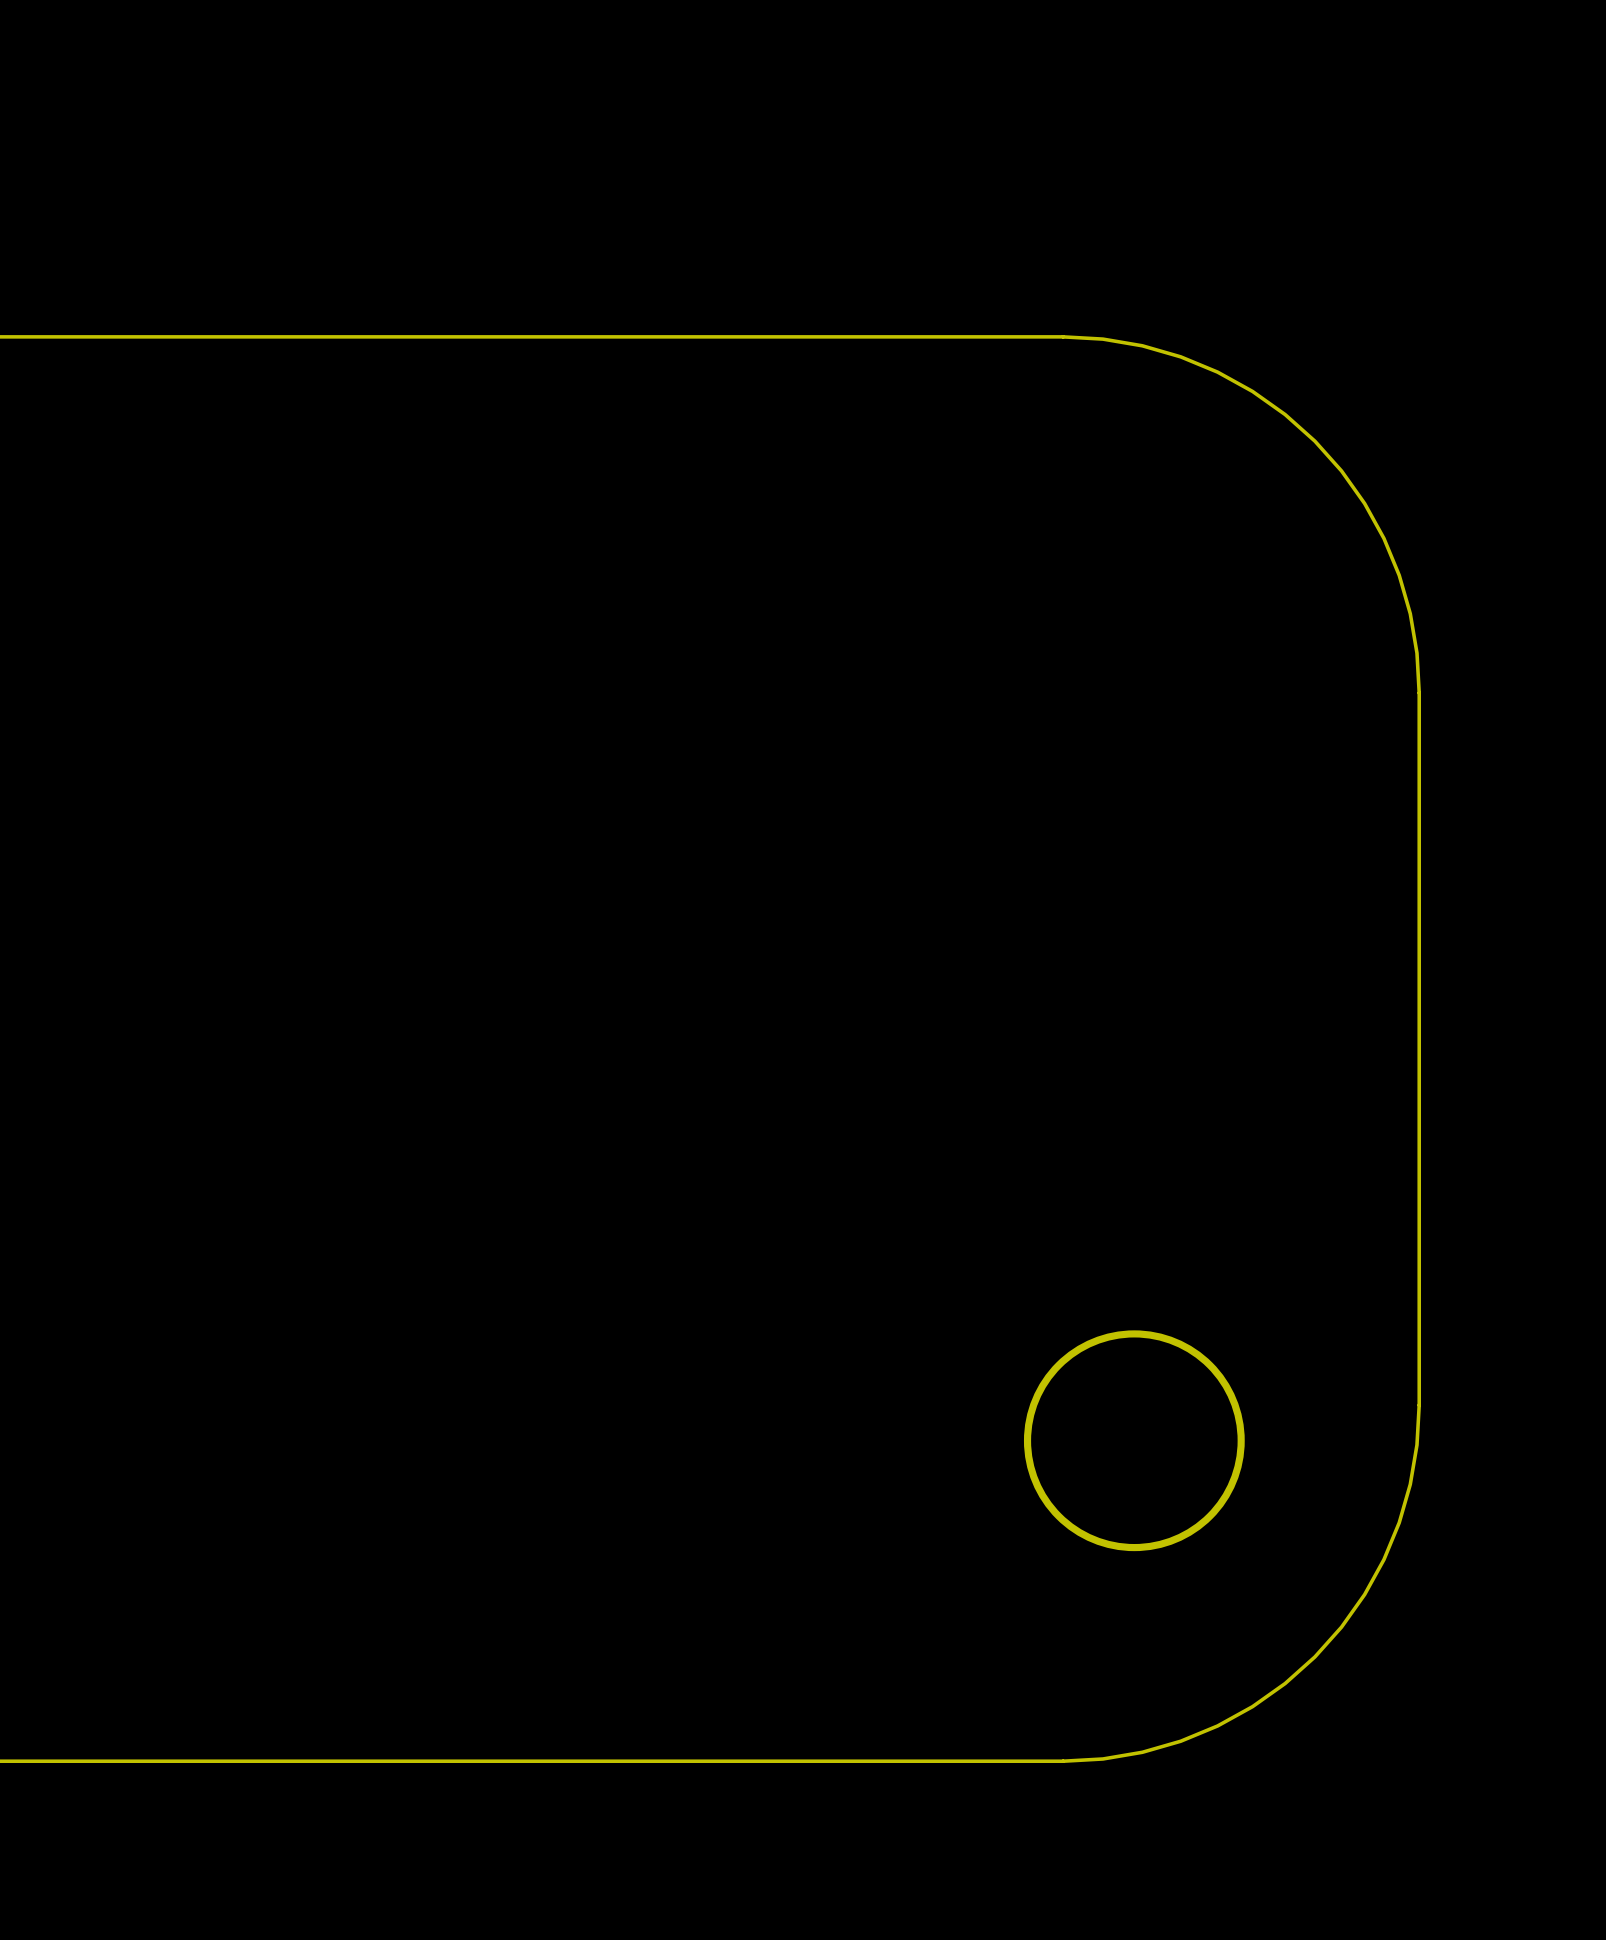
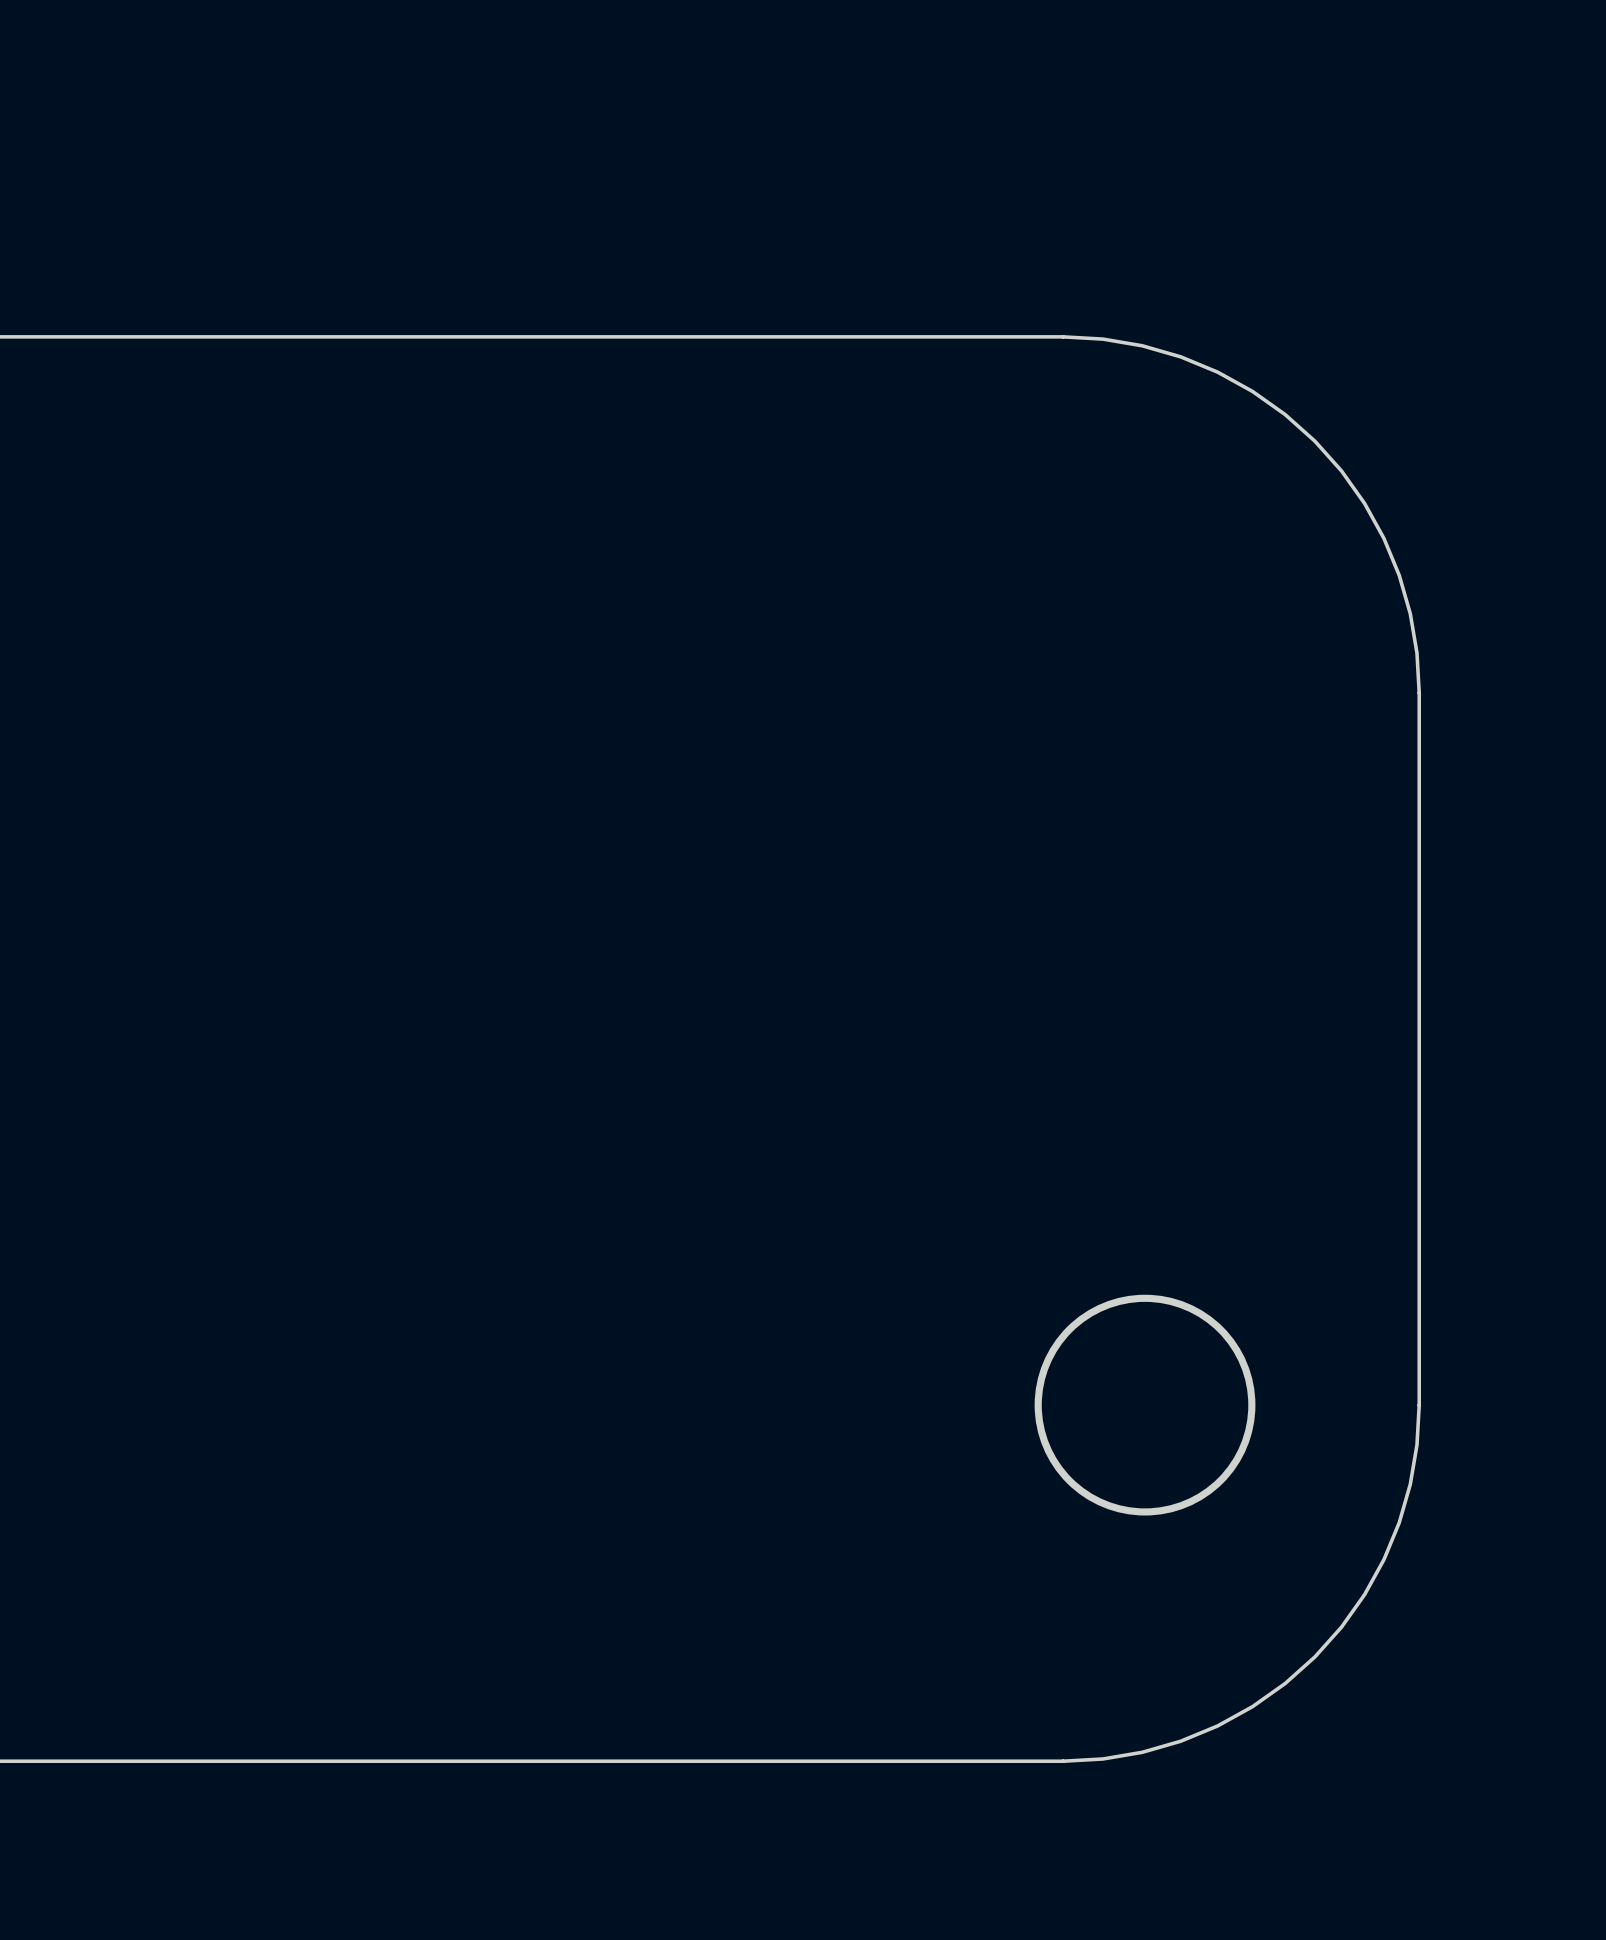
round board edge position: (1134, 1440) -> (1145, 1405)

